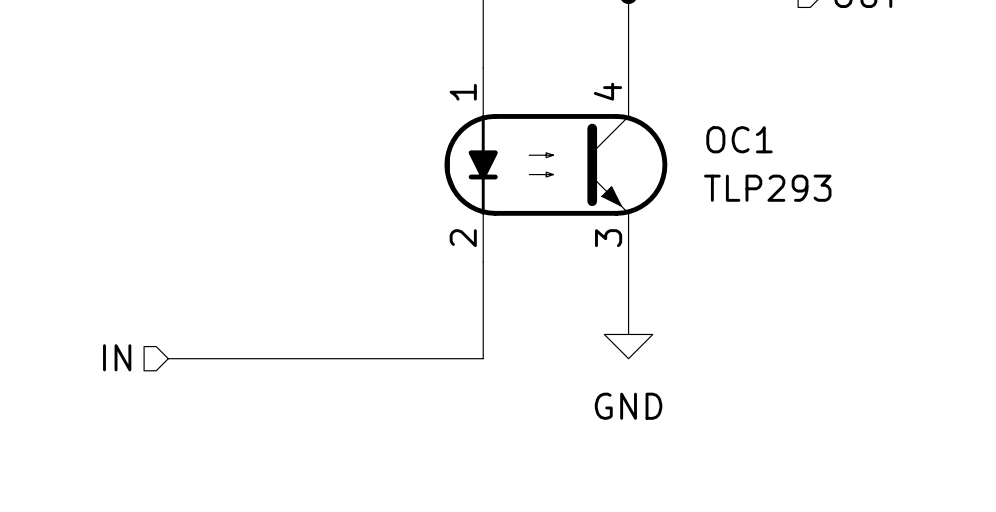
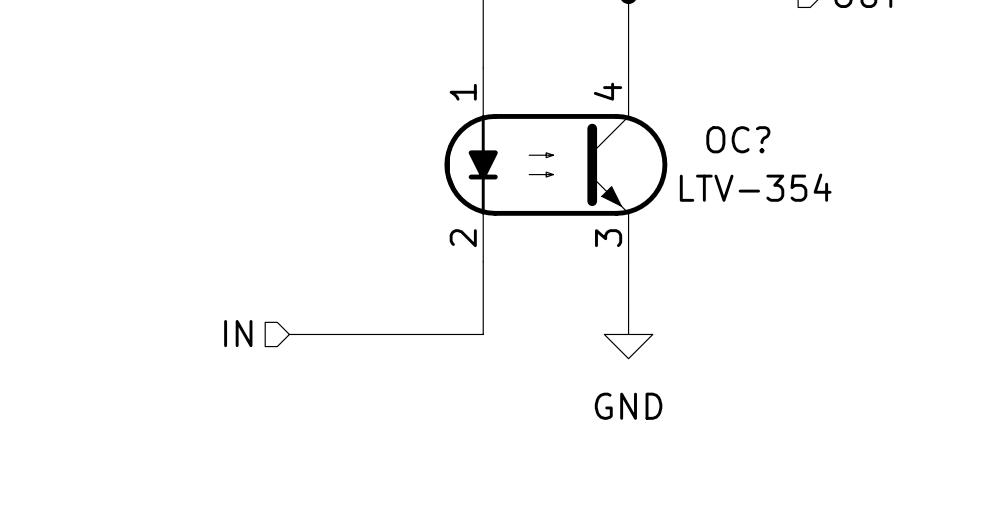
OC1 name: OC1 (739, 139) -> OC? (738, 139)
OC1 text: none -> LTV-354 (755, 187)
OC1 value: TLP293 (767, 188) -> none
wire: (483, 334) (483, 358) (168, 358) -> (483, 334) (289, 334)
hierarchical label position: IN (117, 357) -> IN (238, 333)

